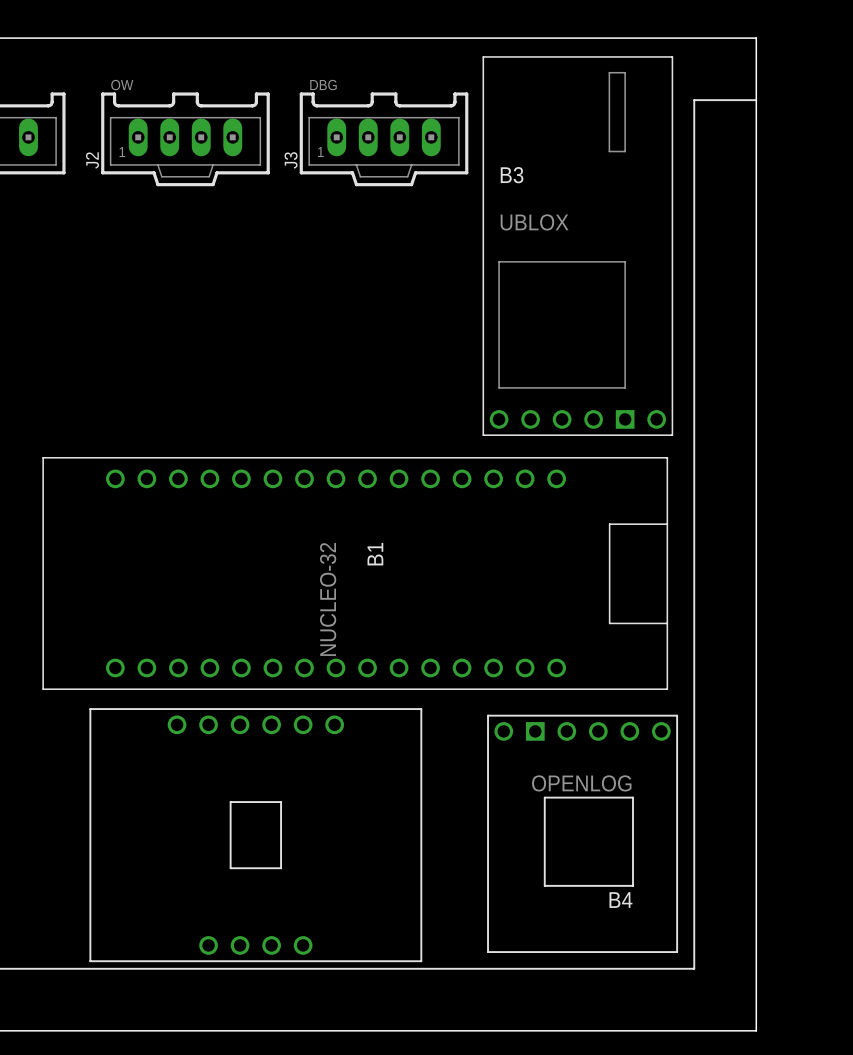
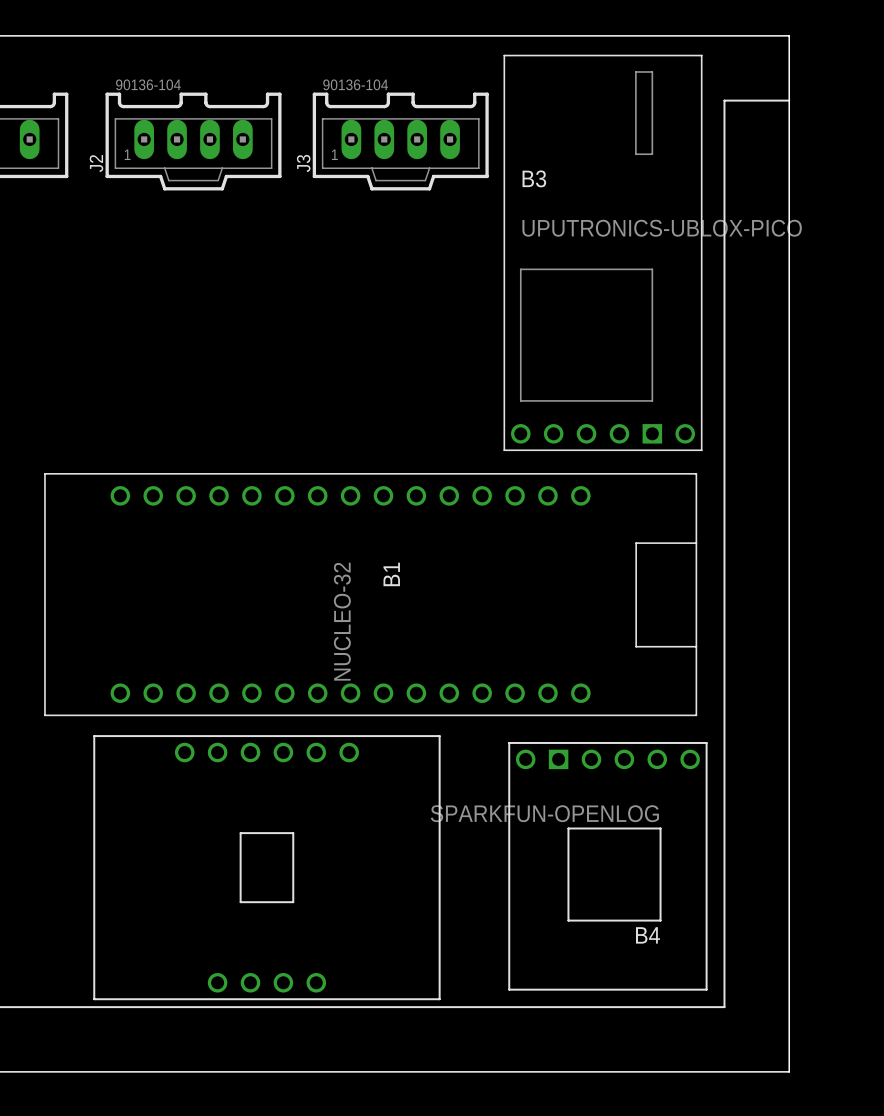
J2 value: OW (122, 85) -> 90136-104 (148, 84)
J3 value: DBG (323, 85) -> 90136-104 (355, 84)
B3 value: UBLOX (534, 222) -> UPUTRONICS-UBLOX-PICO (662, 228)
B4 value: OPENLOG (581, 783) -> SPARKFUN-OPENLOG (544, 813)

